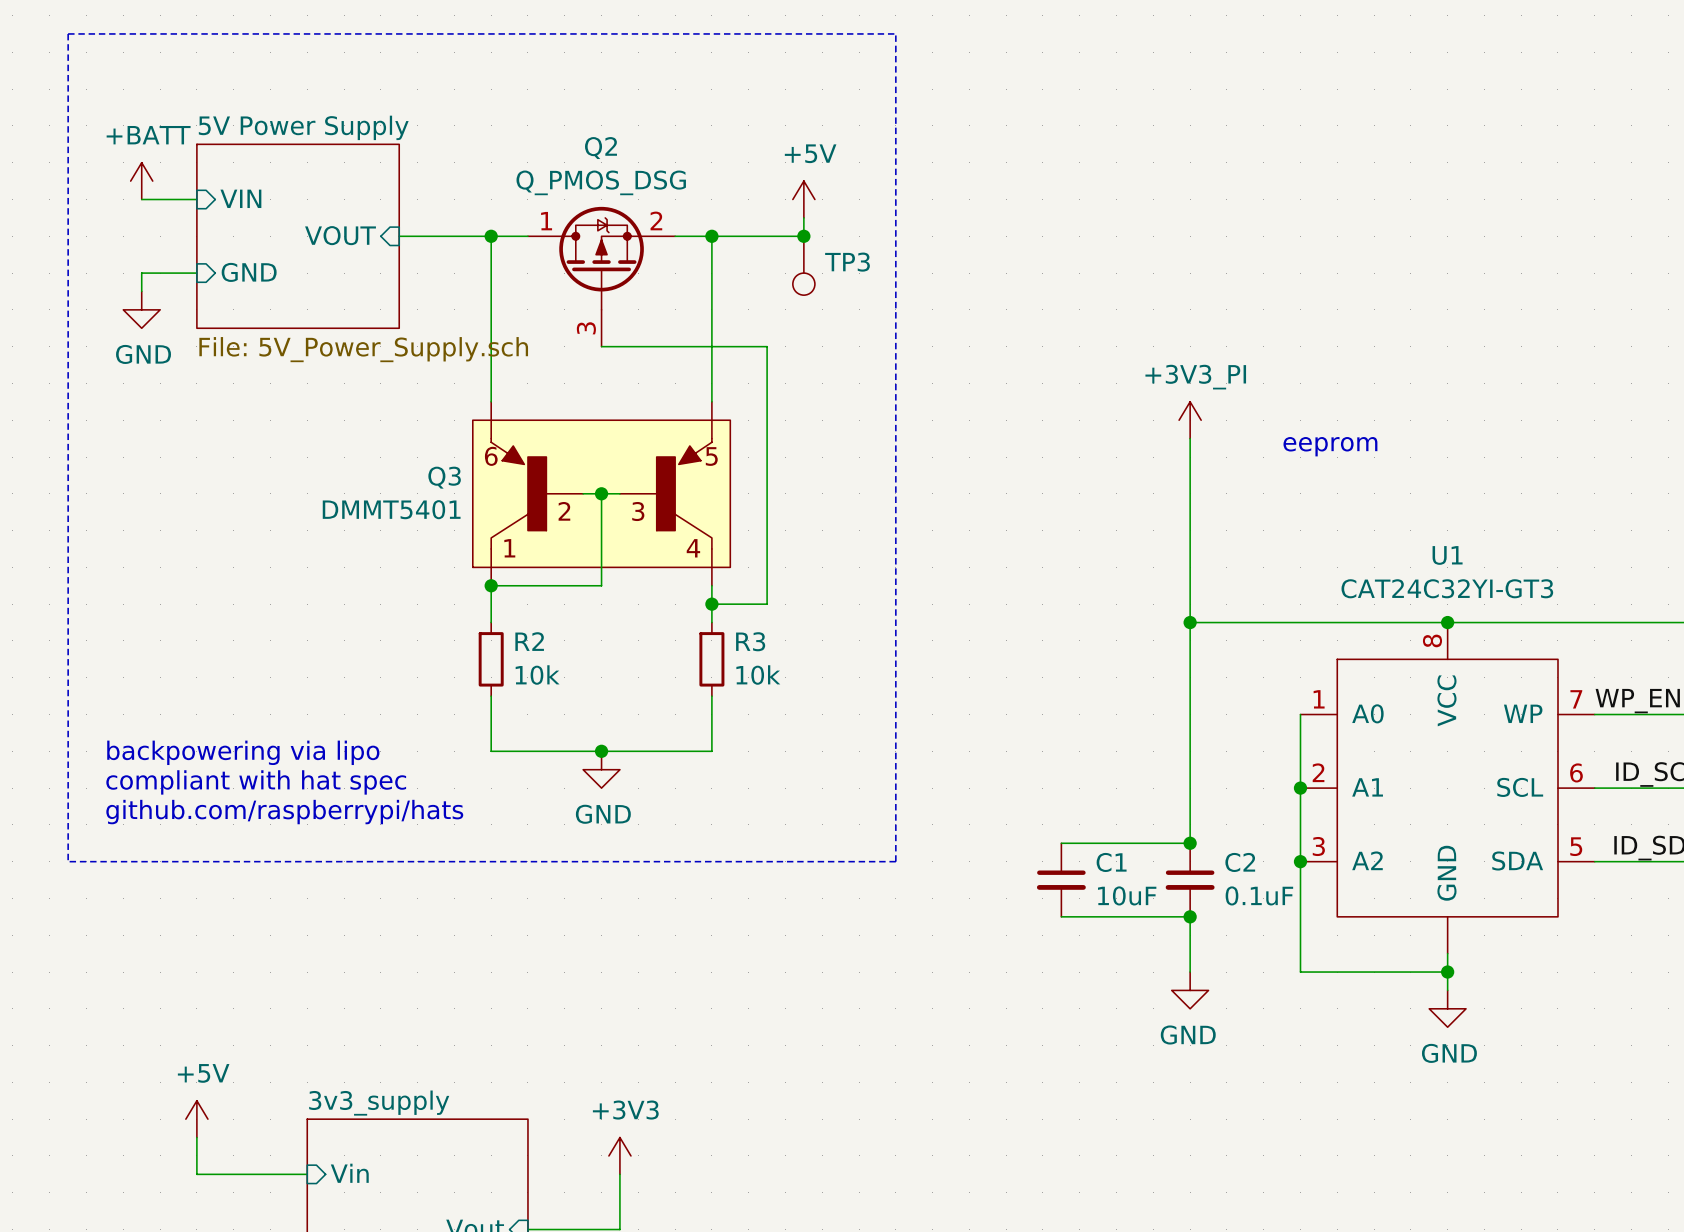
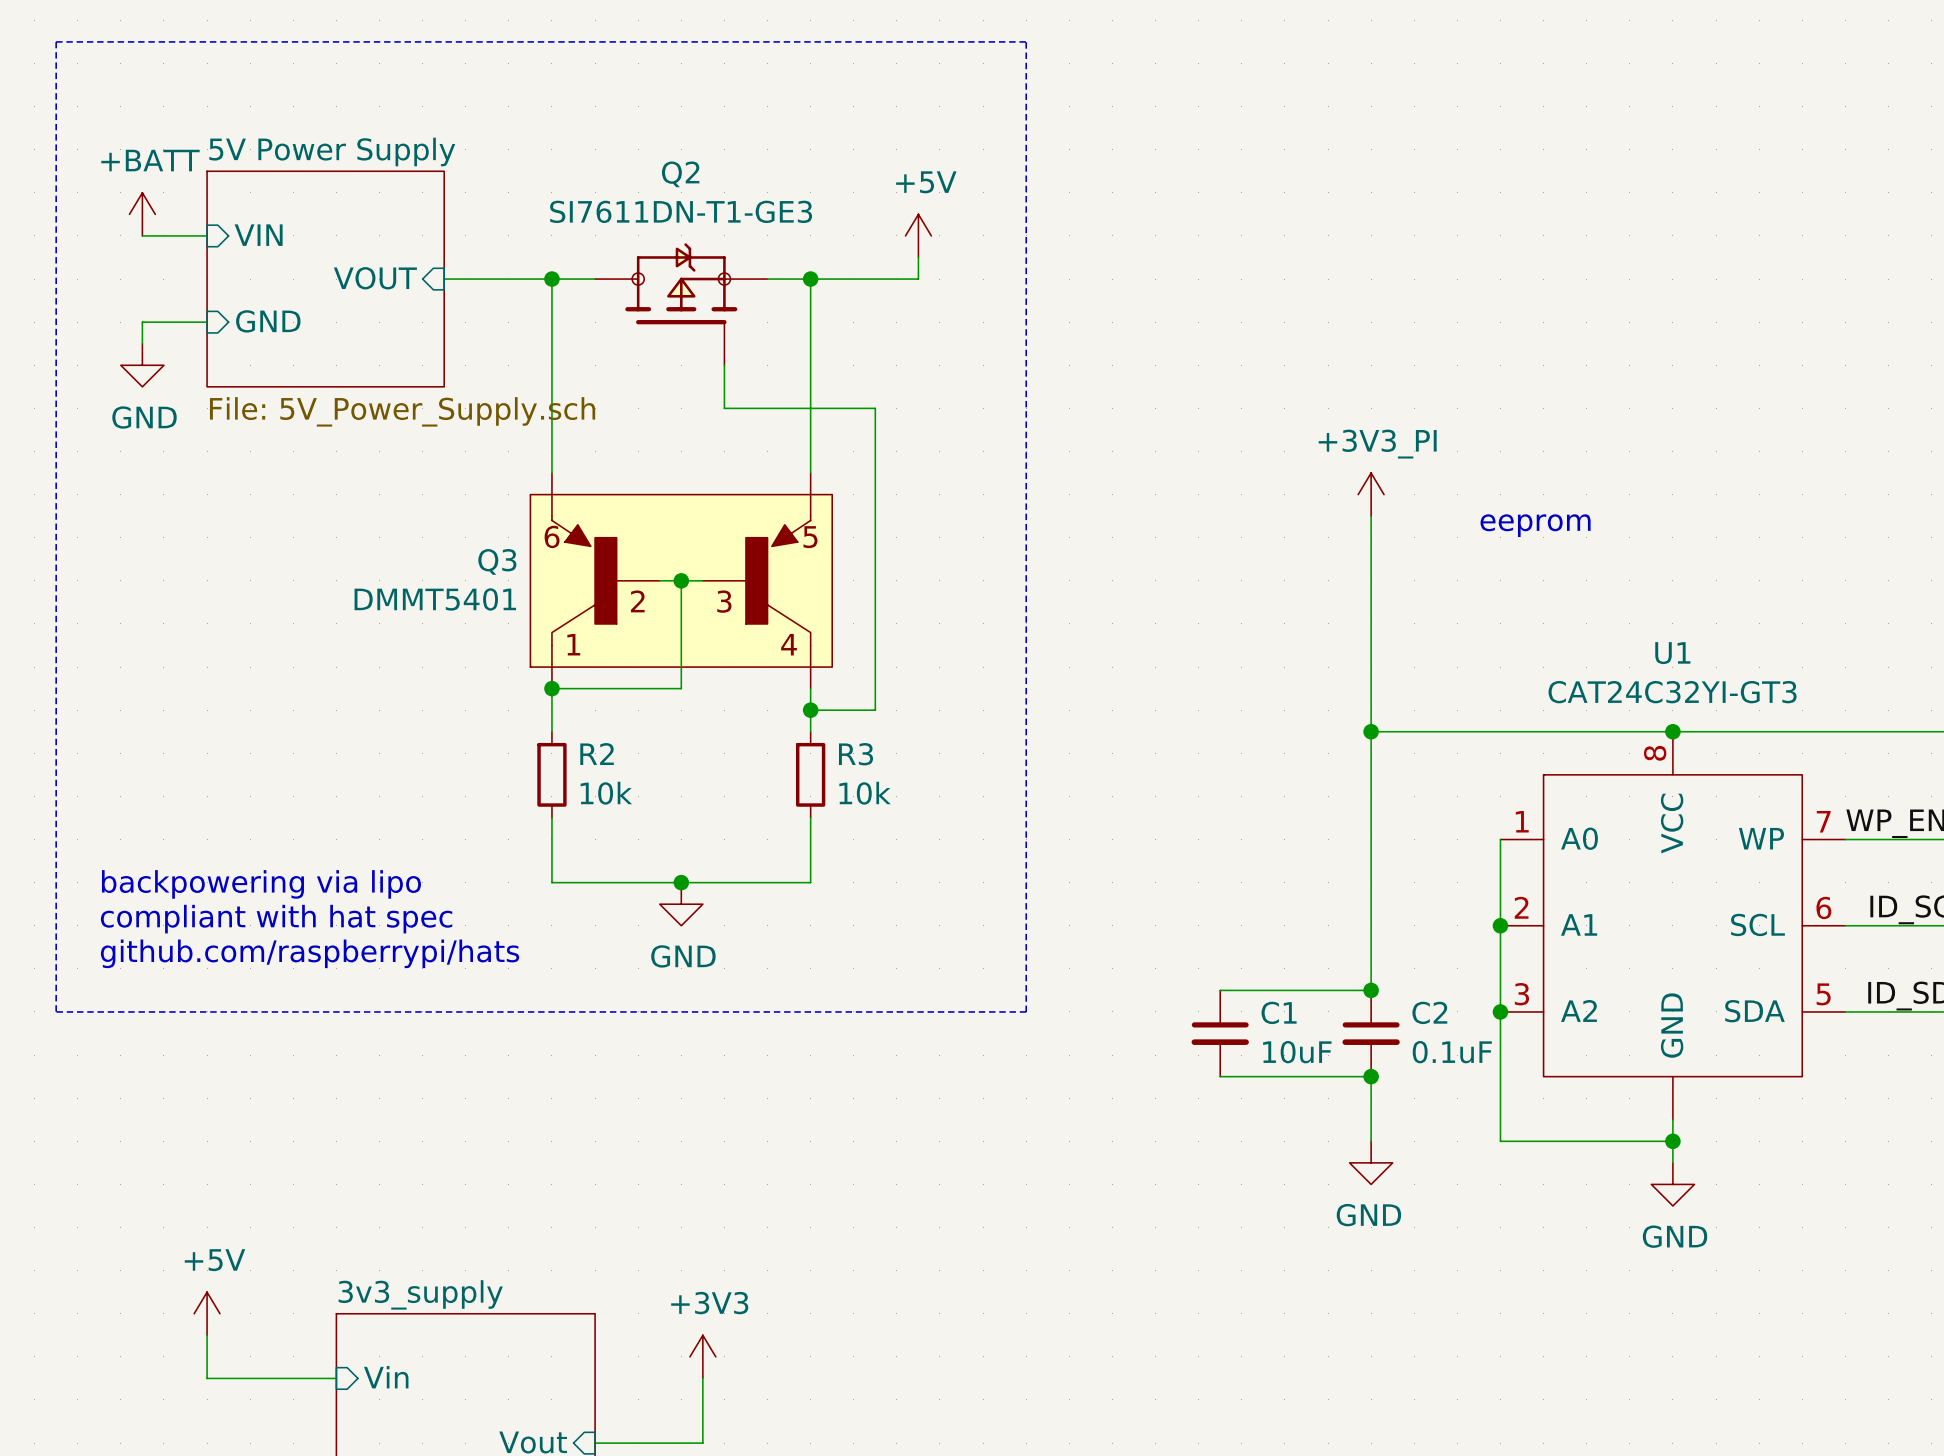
Q2 value: Q_PMOS_DSG (601, 182) -> SI7611DN-T1-GE3 (681, 211)
Q2 symbol: [527, 206, 676, 347] -> [595, 243, 768, 366]
junction: (803, 236) -> none
TP3: (803, 265) -> none
wire: (601, 346) (638, 346) -> (724, 365) (724, 408)

